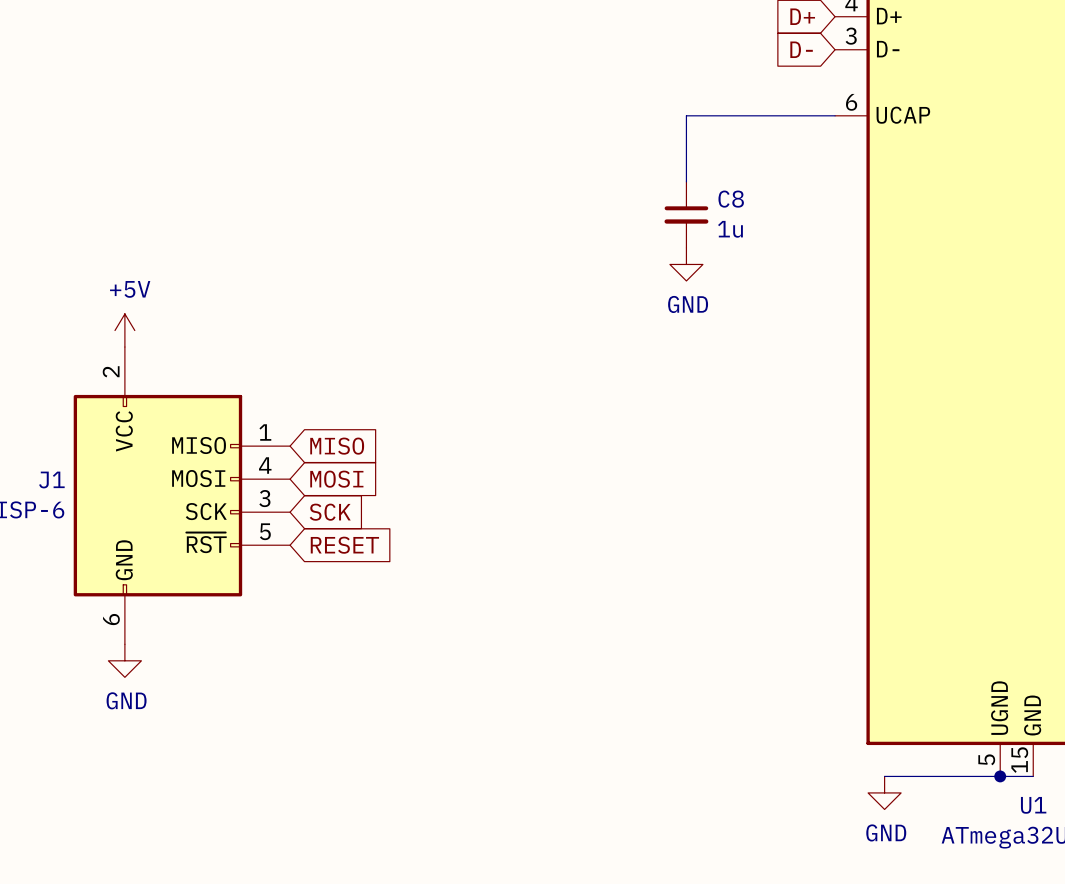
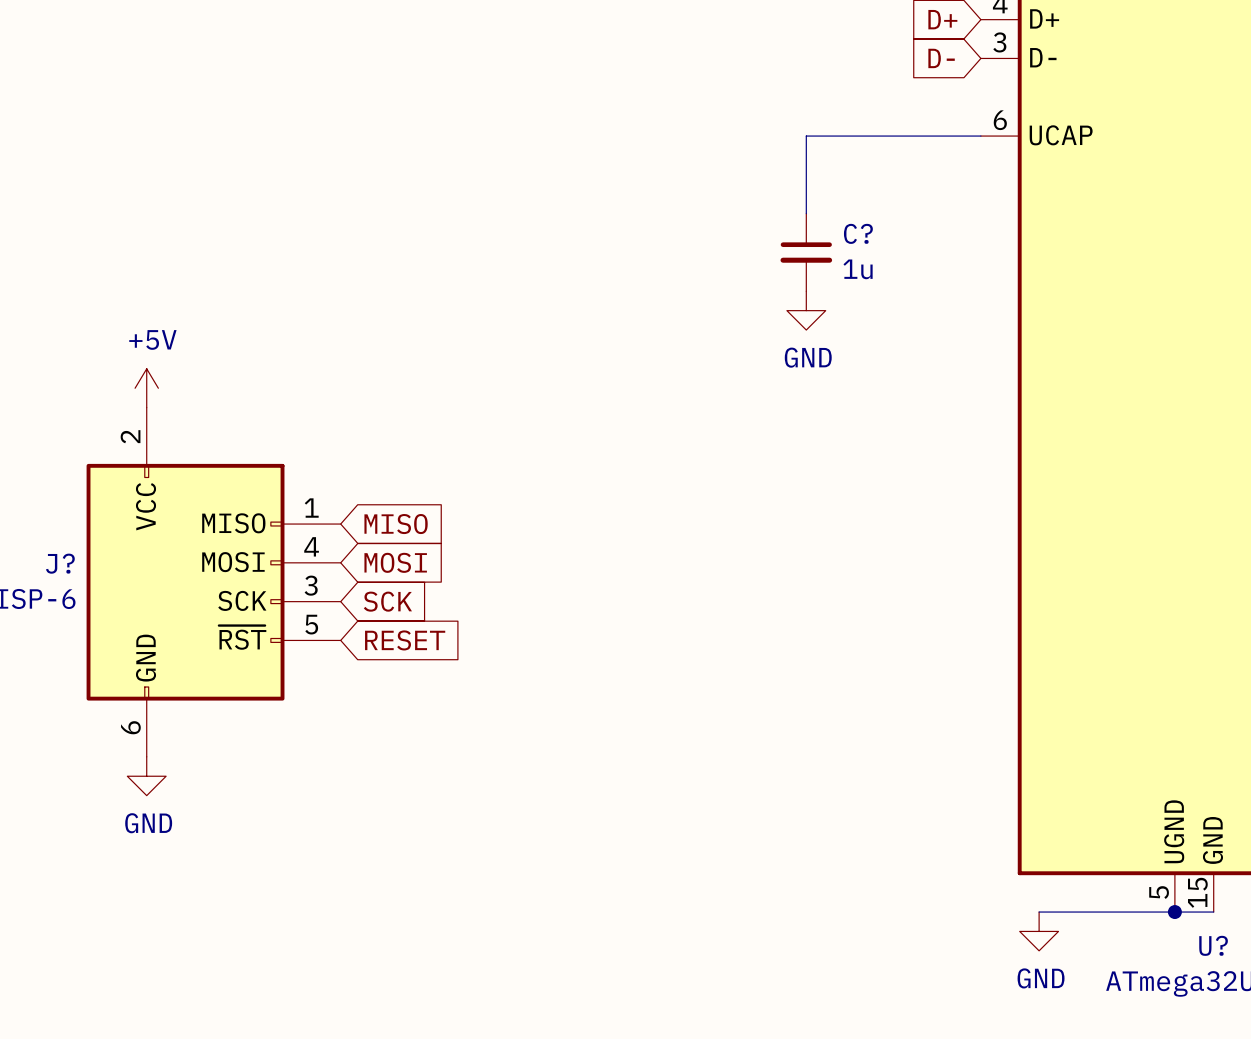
C8 name: C8 (731, 199) -> C? (858, 233)
J1 name: J1 (51, 480) -> J? (60, 563)
U1 name: U1 (1033, 805) -> U? (1213, 945)

